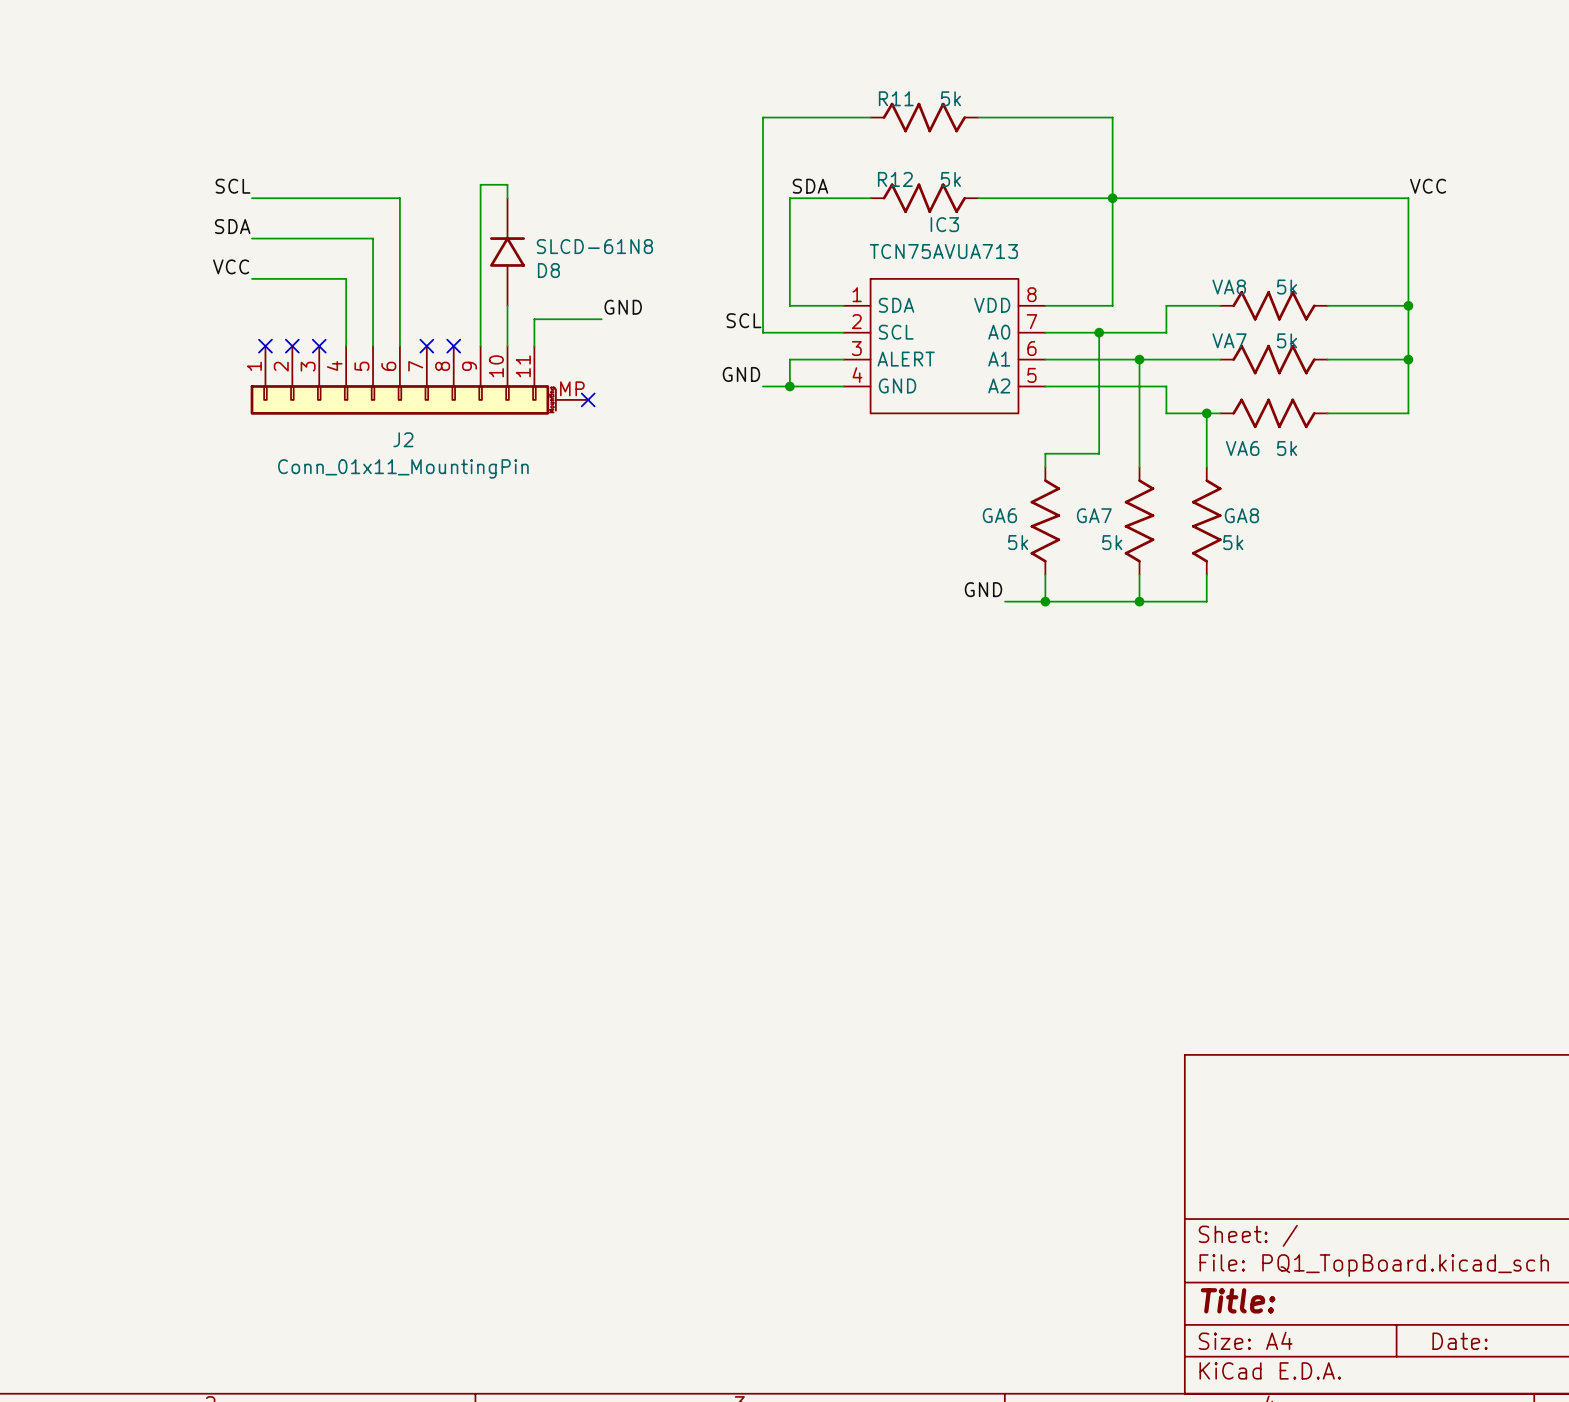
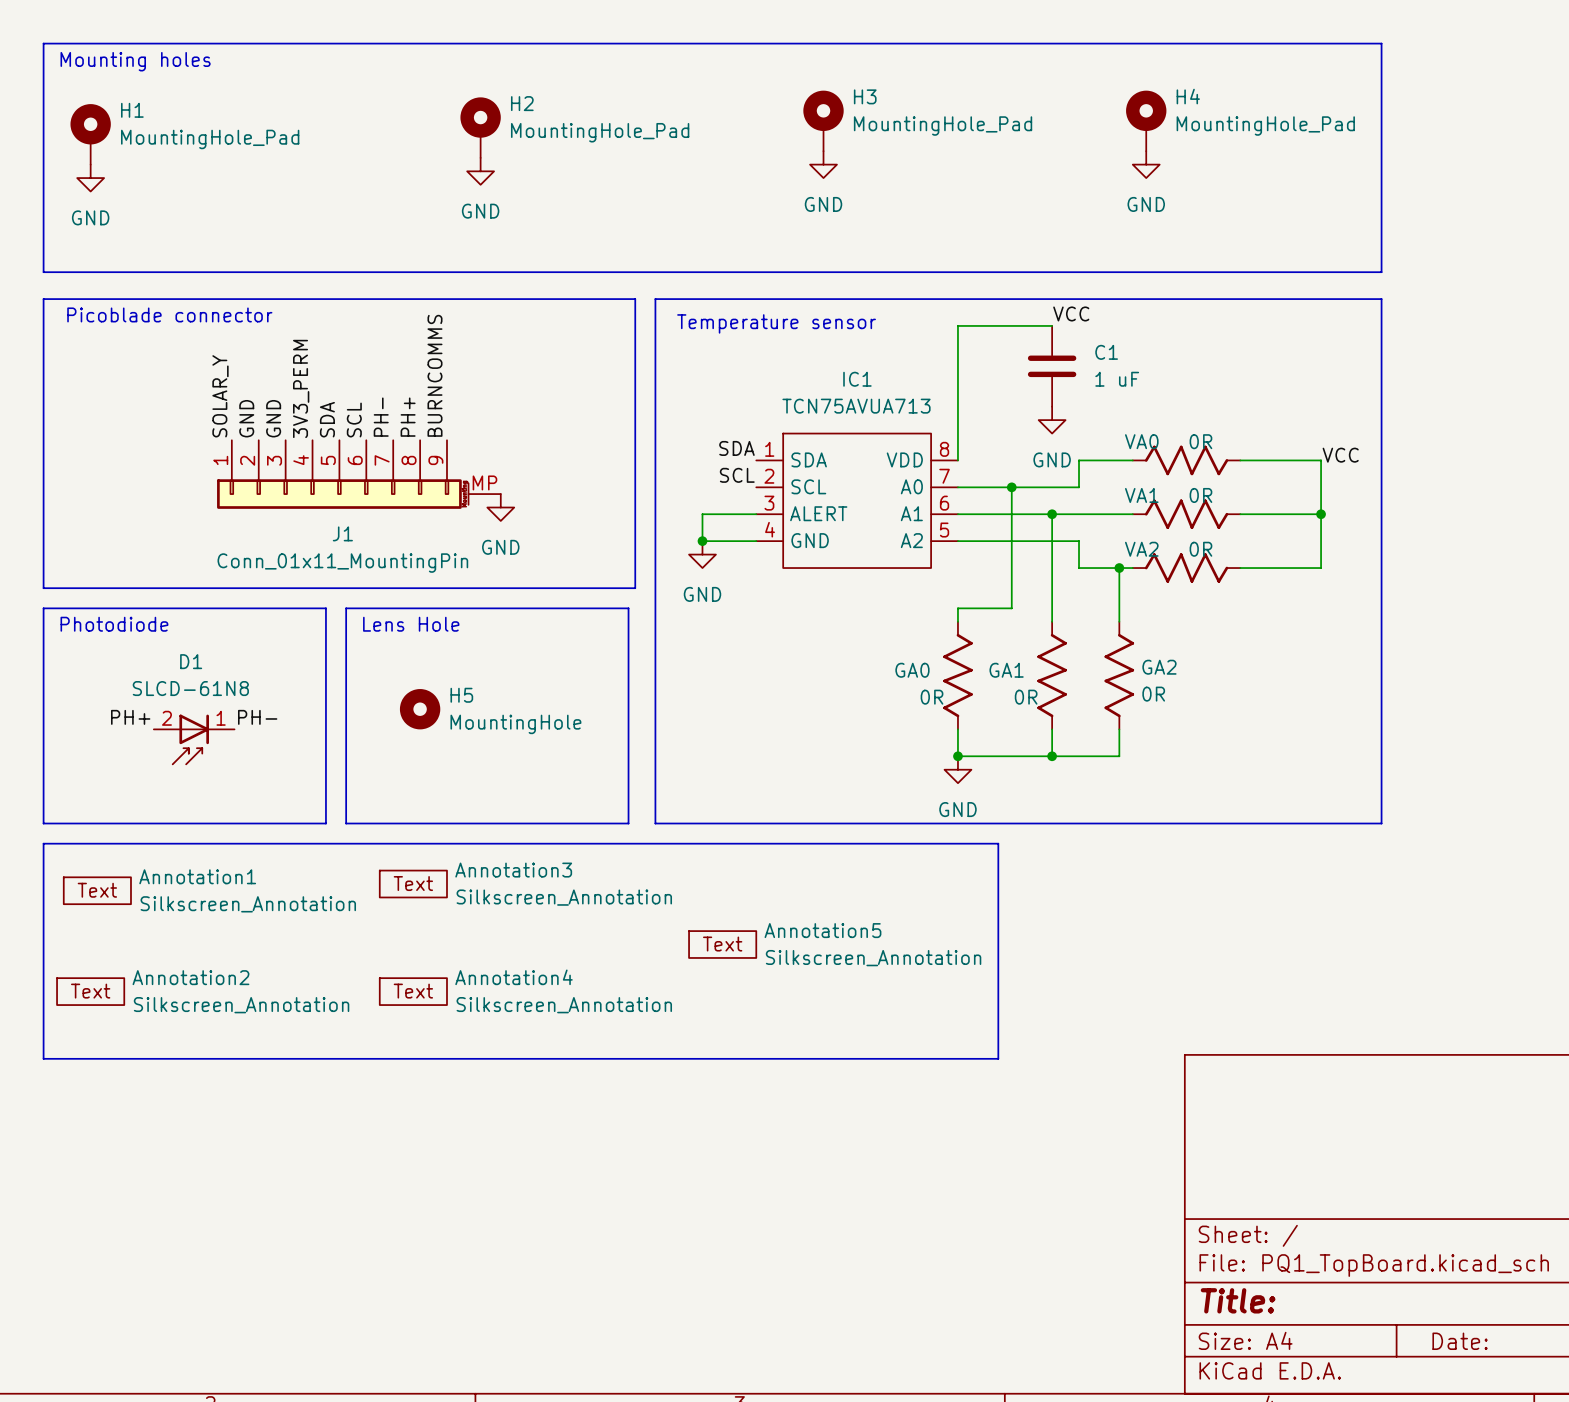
line: none -> (43, 43) (1381, 43) (1381, 272) (43, 272) (43, 43)
text: none -> Mounting holes (135, 61)
wire: (870, 117) (763, 117) (763, 332) (843, 332) -> none
R11: 5k (924, 117) -> none
wire: (978, 117) (1112, 117) (1112, 305) (1045, 305) -> none
H3: none -> MountingHole_Pad (823, 120)
H4: none -> MountingHole_Pad (1146, 120)
H2: none -> MountingHole_Pad (480, 127)
H1: none -> MountingHole_Pad (90, 134)
power symbol: none -> GND (823, 164)
power symbol: none -> GND (1146, 164)
power symbol: none -> GND (480, 171)
power symbol: none -> GND (90, 178)
label: SCL (233, 186) -> none
label: SDA (810, 186) -> none
label: VCC (1428, 186) -> none
wire: (252, 198) (399, 198) (399, 346) -> none
wire: (507, 198) (507, 184) (480, 184) (480, 346) -> none
wire: (870, 198) (789, 198) (789, 305) (843, 305) -> none
R12: 5k (924, 198) -> none
wire: (978, 198) (1408, 198) (1408, 413) (1327, 413) -> none
junction: (1112, 198) -> none
label rotation: 0° (232, 226) -> 90° counterclockwise (327, 419)
label position: SDA (232, 226) -> SDA (327, 419)
wire: (252, 238) (373, 238) (373, 346) -> none
D8: SLCD-61N8 (507, 252) -> none
label: VCC (231, 266) -> none
wire: (252, 278) (346, 278) (346, 346) -> none
line: none -> (43, 299) (635, 299) (635, 588) (43, 588) (43, 299)
line: none -> (655, 299) (655, 823) (1381, 823) (1381, 299) (655, 299)
wire: (507, 305) (507, 346) -> none
wire: (1220, 305) (1166, 305) (1166, 332) (1045, 332) -> (1132, 460) (1079, 460) (1079, 487) (957, 487)
VA8: 5k (1273, 305) -> none
wire: (1327, 305) (1408, 305) -> none
junction: (1408, 305) -> none
label: GND (623, 307) -> none
label: none -> VCC (1071, 313)
text: none -> Picoblade connector (169, 314)
wire: (601, 319) (534, 319) (534, 346) -> none
label position: SCL (744, 320) -> SCL (737, 475)
text: none -> Temperature sensor (776, 323)
wire: none -> (1052, 325) (957, 325) (957, 460)
wire: (1099, 332) (1099, 453) (1045, 453) (1045, 467) -> (1011, 487) (1011, 608) (957, 608) (957, 621)
junction: (1099, 332) -> none
no-connect mark: (265, 346) -> none
no-connect mark: (292, 346) -> none
no-connect mark: (319, 346) -> none
no-connect mark: (426, 346) -> none
no-connect mark: (453, 346) -> none
IC3: TCN75AVUA713 (944, 346) -> none
wire: (843, 359) (789, 359) (789, 386) -> none
wire: (1045, 359) (1220, 359) -> (957, 514) (1132, 514)
wire: (1139, 359) (1139, 467) -> (1052, 514) (1052, 621)
junction: (1139, 359) -> none
VA7: 5k (1273, 359) -> none
wire: (1327, 359) (1408, 359) -> (1240, 514) (1321, 514)
junction: (1408, 359) -> none
C1: none -> 1 uF (1052, 366)
label: GND (741, 374) -> none
label: none -> BURNCOMMS (434, 375)
J2: Conn_01x11_MountingPin (419, 380) -> none
wire: (763, 386) (843, 386) -> none
junction: (789, 386) -> none
wire: (1045, 386) (1166, 386) (1166, 413) (1220, 413) -> (957, 541) (1079, 541) (1079, 568) (1132, 568)
label: none -> 3V3_PERM (301, 388)
label: none -> SOLAR_Y (220, 396)
no-connect mark: (588, 399) -> none
wire: (1206, 413) (1206, 467) -> (1119, 568) (1119, 621)
junction: (1206, 413) -> none
VA6: 5k (1273, 413) -> none
label: none -> PH- (381, 417)
label: none -> PH+ (408, 417)
label: none -> GND (246, 418)
label: none -> GND (273, 418)
label: none -> SCL (354, 420)
power symbol: none -> GND (1052, 420)
label: none -> SDA (736, 448)
label: none -> VCC (1340, 455)
VA0: none -> 0R (1186, 460)
wire: none -> (1240, 460) (1321, 460) (1321, 568) (1240, 568)
J1: none -> Conn_01x11_MountingPin (358, 474)
junction: none -> (1011, 487)
IC1: none -> TCN75AVUA713 (857, 500)
power symbol: none -> GND (500, 507)
wire: none -> (756, 514) (702, 514) (702, 541) (756, 541)
junction: none -> (1052, 514)
VA1: none -> 0R (1186, 514)
junction: none -> (1321, 514)
GA6: 5k (1045, 520) -> none
GA7: 5k (1139, 520) -> none
GA8: 5k (1206, 520) -> none
junction: none -> (702, 541)
power symbol: none -> GND (702, 554)
VA2: none -> 0R (1186, 568)
wire: (1045, 574) (1045, 601) -> none
wire: (1139, 574) (1139, 601) -> (1052, 729) (1052, 756)
wire: (1206, 574) (1206, 601) (1005, 601) -> none
label: GND (983, 589) -> none
junction: (1045, 601) -> none
junction position: (1139, 601) -> (1119, 568)
line: none -> (43, 608) (43, 823) (325, 823) (325, 608) (43, 608)
line: none -> (346, 608) (628, 608) (628, 823) (346, 823) (346, 608)
text: none -> Photodiode (114, 624)
text: none -> Lens Hole (411, 624)
GA0: none -> 0R (957, 675)
GA1: none -> 0R (1052, 675)
GA2: none -> 0R (1119, 675)
H5: none -> MountingHole (420, 709)
label: none -> PH+ (130, 717)
label: none -> PH- (257, 717)
wire: none -> (957, 729) (957, 756) (1119, 756) (1119, 729)
D1: none -> SLCD-61N8 (194, 739)
junction: none -> (957, 756)
junction: none -> (1052, 756)
power symbol: none -> GND (957, 769)
line: none -> (43, 843) (43, 1058) (998, 1058) (998, 843) (43, 843)
Annotation3: none -> Silkscreen_Annotation (413, 884)
Annotation1: none -> Silkscreen_Annotation (97, 890)
Annotation5: none -> Silkscreen_Annotation (722, 944)
Annotation2: none -> Silkscreen_Annotation (90, 991)
Annotation4: none -> Silkscreen_Annotation (413, 991)

